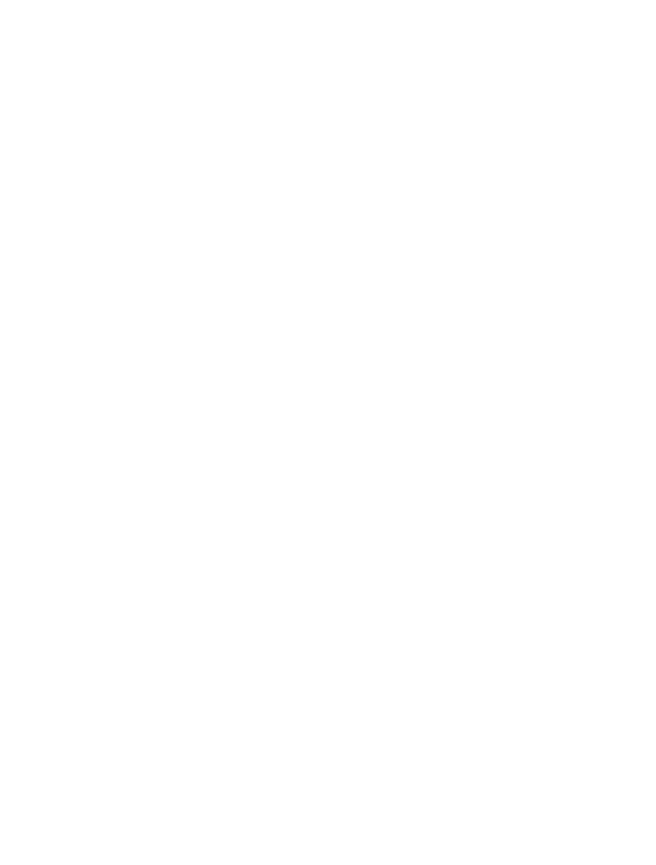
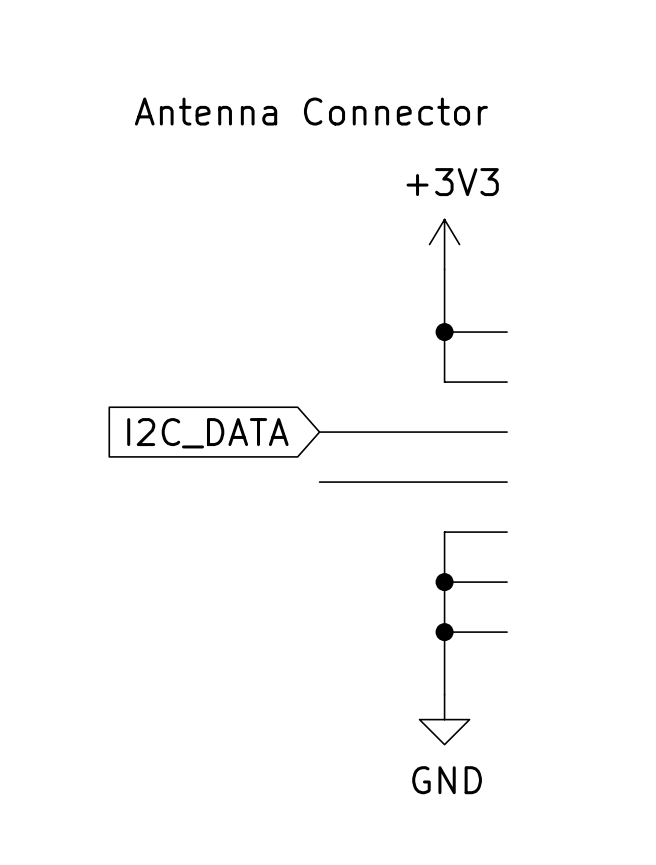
text: none -> Antenna Connector (311, 111)
power symbol: none -> +3V3 (444, 244)
wire: none -> (444, 269) (444, 382) (507, 382)
wire: none -> (444, 332) (507, 332)
junction: none -> (444, 332)
wire: none -> (319, 432) (507, 432)
global label: none -> I2C_DATA (207, 433)
wire: none -> (319, 482) (507, 482)
wire: none -> (507, 532) (444, 532) (444, 694)
wire: none -> (444, 582) (507, 582)
junction: none -> (444, 582)
wire: none -> (444, 632) (507, 632)
junction: none -> (444, 632)
power symbol: none -> GND (444, 719)

